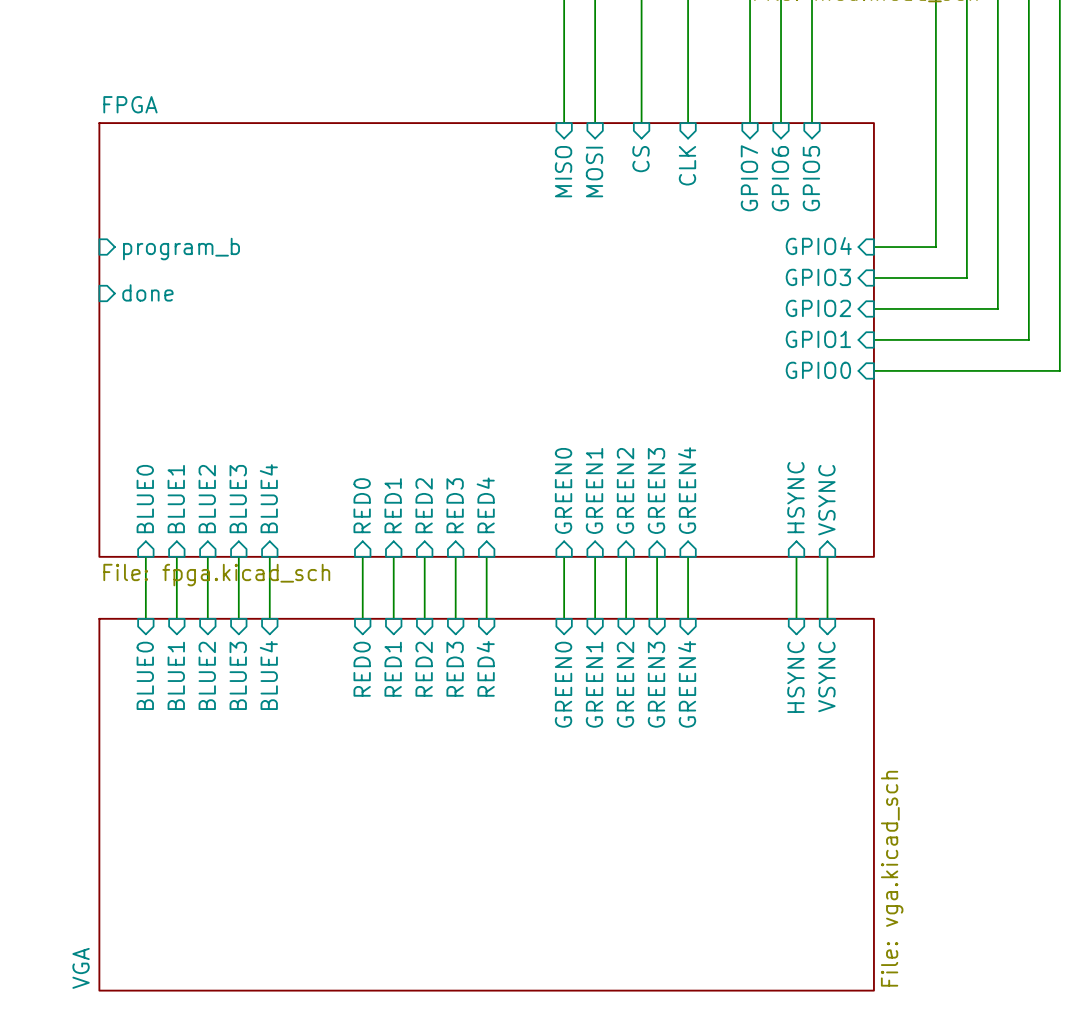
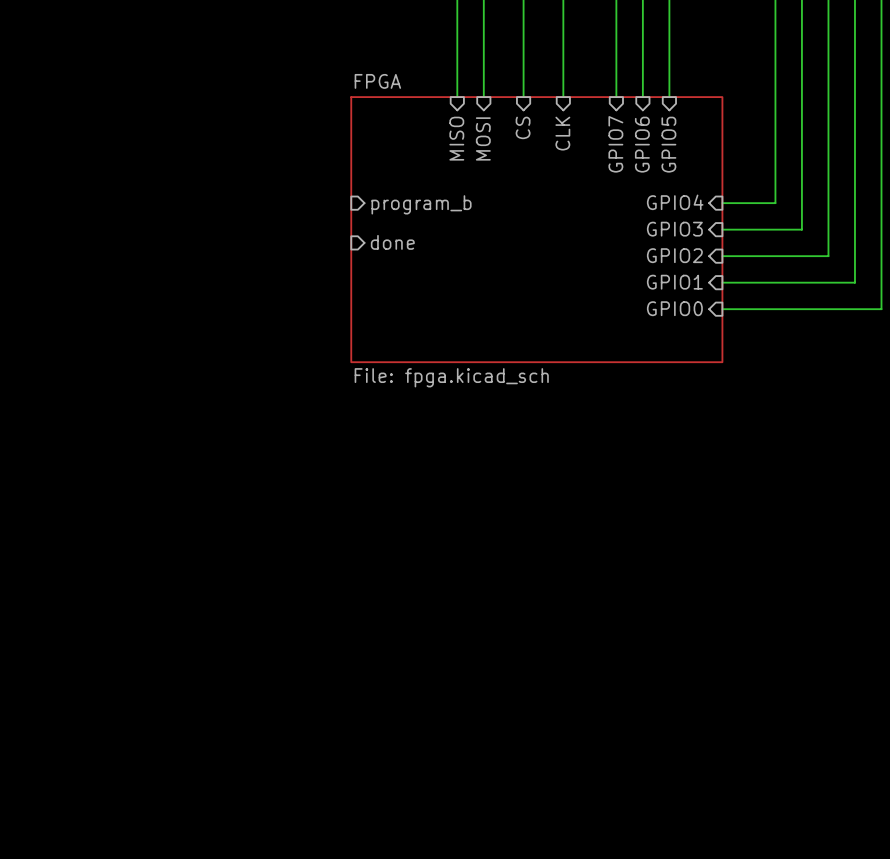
sheet pin: program_b (181, 249) -> none
sheet pin: none -> program_b (421, 204)
sheet FPGA: none -> File: fpga.kicad_sch (536, 229)
sheet pin: done (147, 292) -> none
sheet pin: none -> done (392, 242)
sheet FPGA: File: fpga.kicad_sch (486, 339) -> none
sheet pin: GREEN0 (563, 490) -> none
sheet pin: GREEN1 (594, 490) -> none
sheet pin: GREEN2 (625, 490) -> none
sheet pin: GREEN3 (656, 490) -> none
sheet pin: GREEN4 (687, 490) -> none
sheet pin: HSYNC (795, 497) -> none
sheet pin: BLUE4 (268, 498) -> none
sheet pin: BLUE0 (145, 499) -> none
sheet pin: BLUE1 (176, 499) -> none
sheet pin: BLUE2 (207, 499) -> none
sheet pin: BLUE3 (238, 499) -> none
sheet pin: VSYNC (826, 500) -> none
sheet pin: RED0 (362, 505) -> none
sheet pin: RED1 (393, 505) -> none
sheet pin: RED2 (424, 505) -> none
sheet pin: RED3 (455, 505) -> none
sheet pin: RED4 (485, 505) -> none
wire: (145, 556) (145, 618) -> none
wire: (176, 556) (176, 618) -> none
wire: (207, 556) (207, 618) -> none
wire: (238, 556) (238, 618) -> none
wire: (269, 556) (269, 618) -> none
wire: (362, 556) (362, 618) -> none
wire: (393, 556) (393, 618) -> none
wire: (424, 556) (424, 618) -> none
wire: (455, 556) (455, 618) -> none
wire: (486, 556) (486, 618) -> none
wire: (564, 556) (564, 618) -> none
wire: (595, 556) (595, 618) -> none
wire: (626, 556) (626, 618) -> none
wire: (657, 556) (657, 618) -> none
wire: (688, 556) (688, 618) -> none
wire: (796, 556) (796, 618) -> none
wire: (827, 556) (827, 618) -> none
sheet pin: RED4 (485, 668) -> none
sheet pin: RED0 (362, 669) -> none
sheet pin: RED1 (393, 669) -> none
sheet pin: RED2 (424, 669) -> none
sheet pin: RED3 (455, 669) -> none
sheet pin: BLUE0 (145, 675) -> none
sheet pin: BLUE1 (176, 675) -> none
sheet pin: BLUE2 (207, 675) -> none
sheet pin: BLUE3 (238, 675) -> none
sheet pin: BLUE4 (268, 675) -> none
sheet pin: VSYNC (826, 676) -> none
sheet pin: HSYNC (795, 677) -> none
sheet pin: GREEN0 (563, 684) -> none
sheet pin: GREEN1 (594, 684) -> none
sheet pin: GREEN2 (625, 684) -> none
sheet pin: GREEN3 (656, 684) -> none
sheet pin: GREEN4 (687, 684) -> none
sheet VGA: File: vga.kicad_sch (486, 804) -> none

